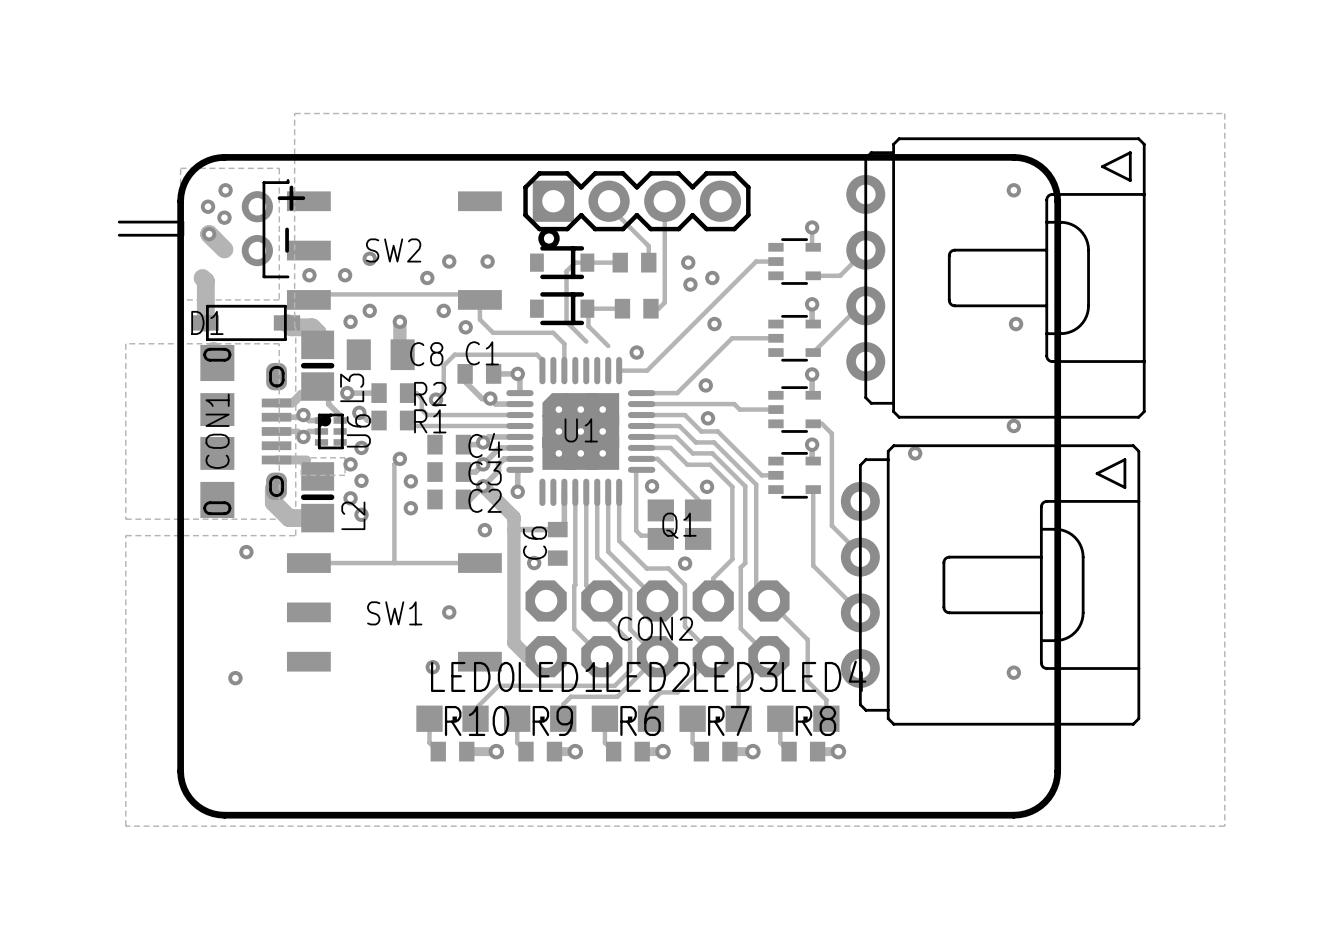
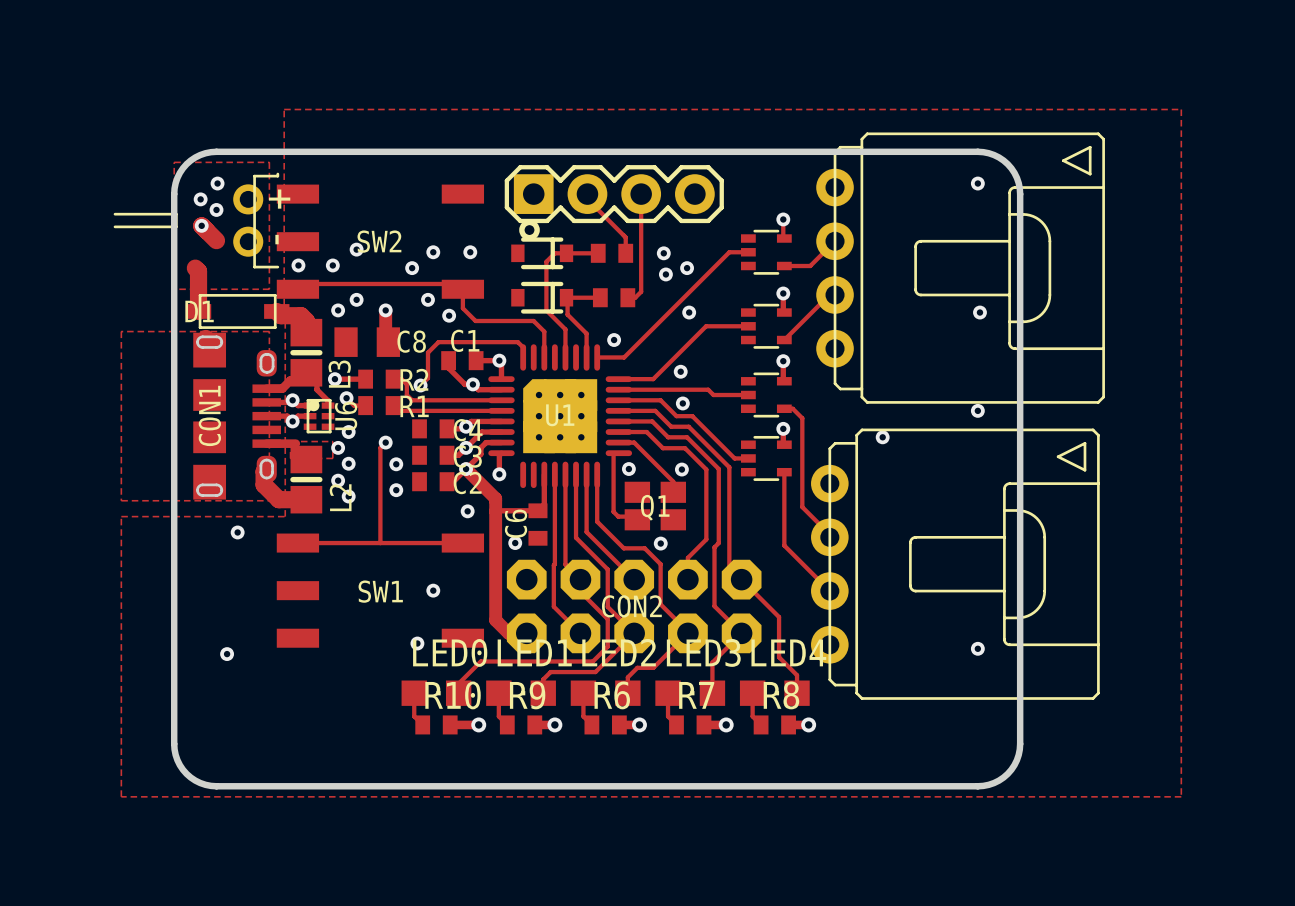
track: none -> (565, 329) (565, 357)
track: none -> (586, 333) (586, 357)

